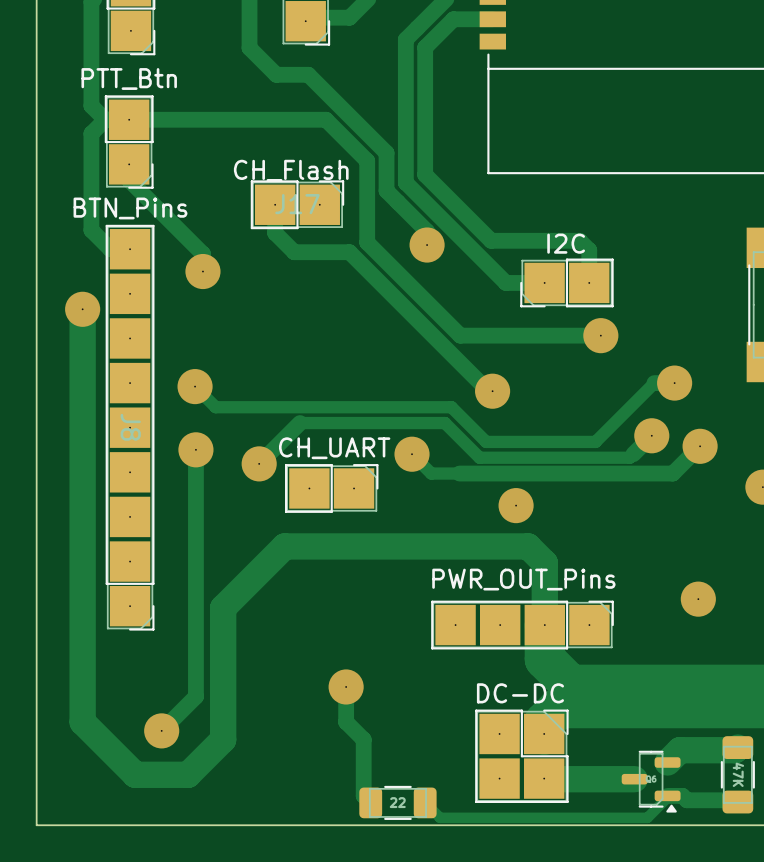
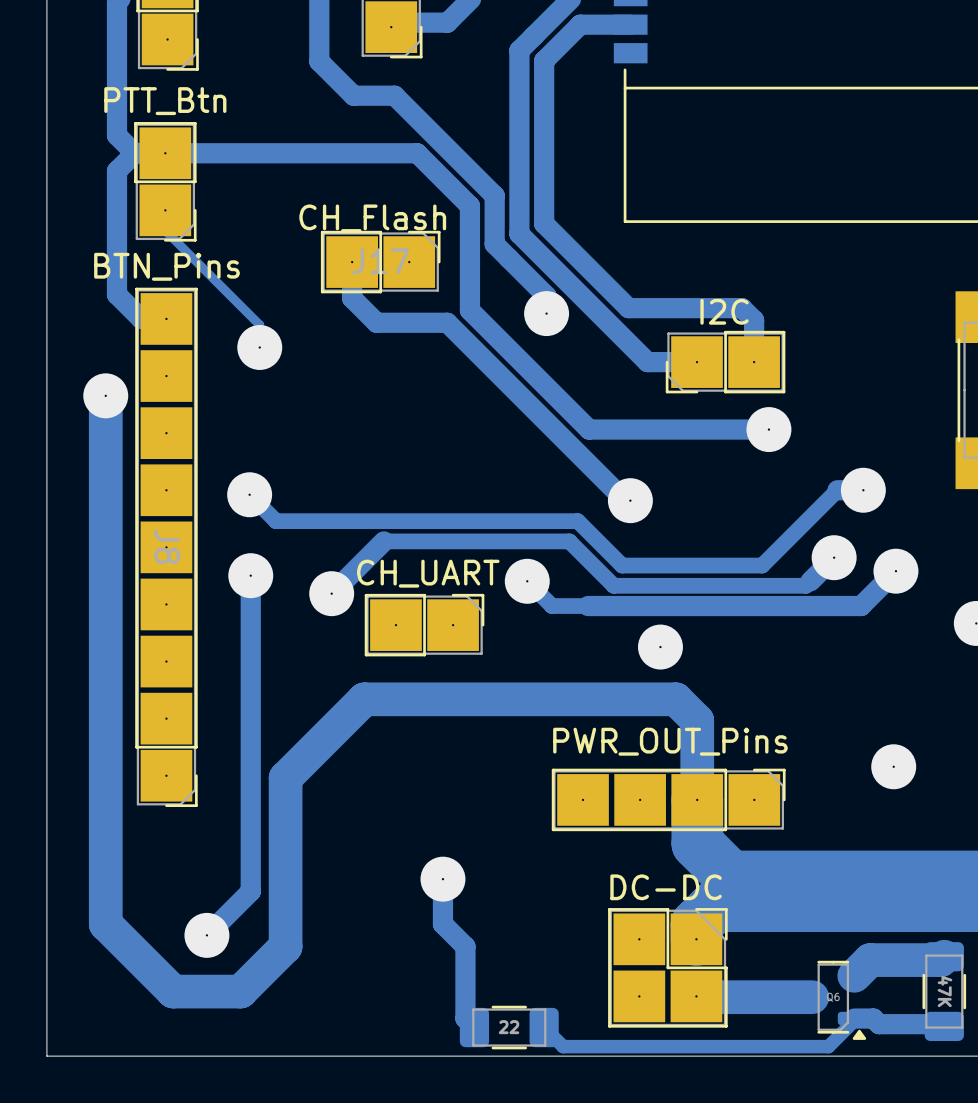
track width: thick (129, 164) (129, 180) (202, 253) (202, 271) -> thin (165, 210) (165, 230) (259, 325) (259, 347)

